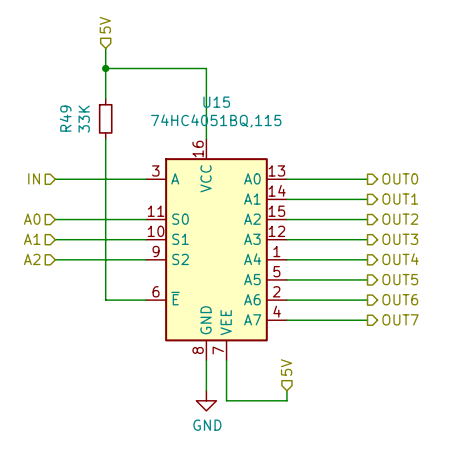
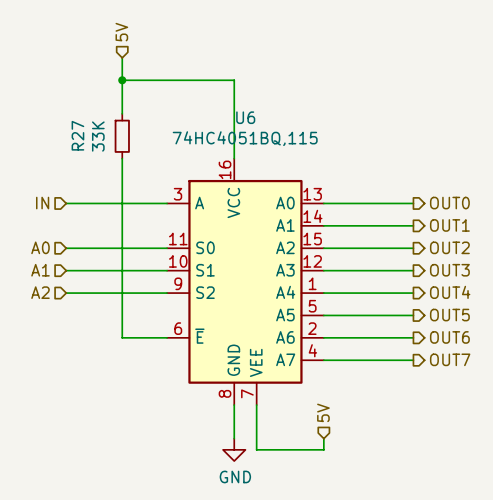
U15 name: U15 (216, 102) -> U6 (245, 117)
R49 name: R49 (65, 118) -> R27 (77, 135)

